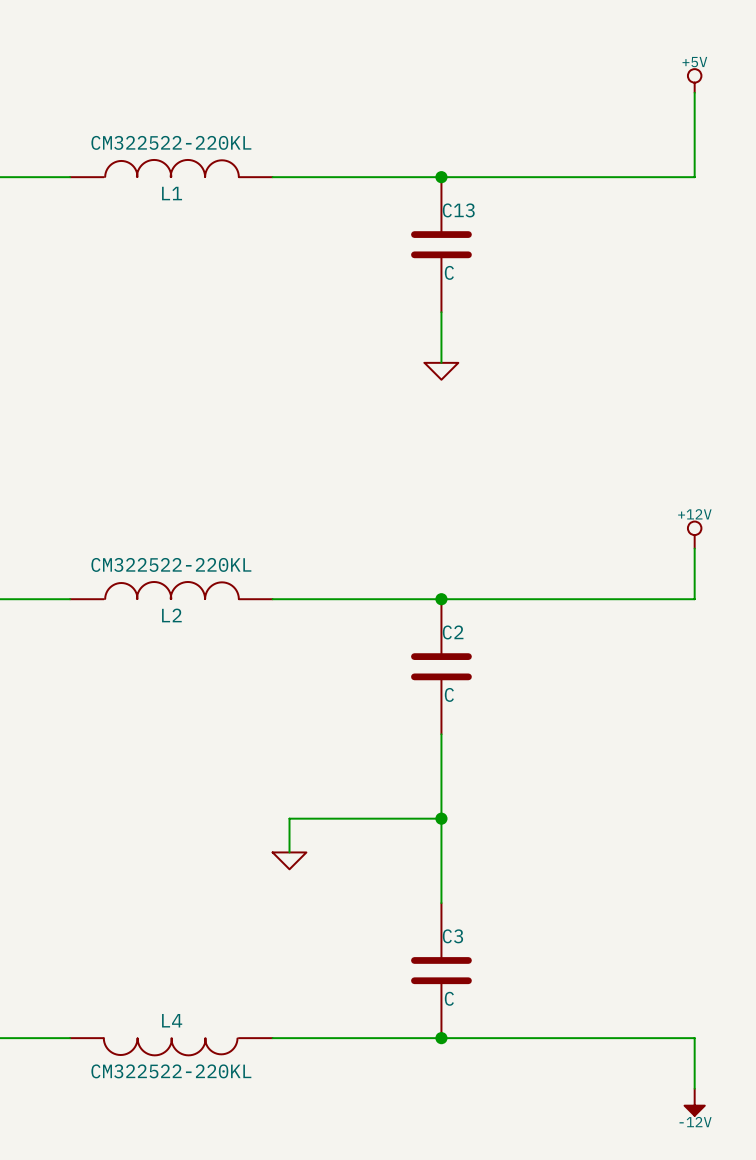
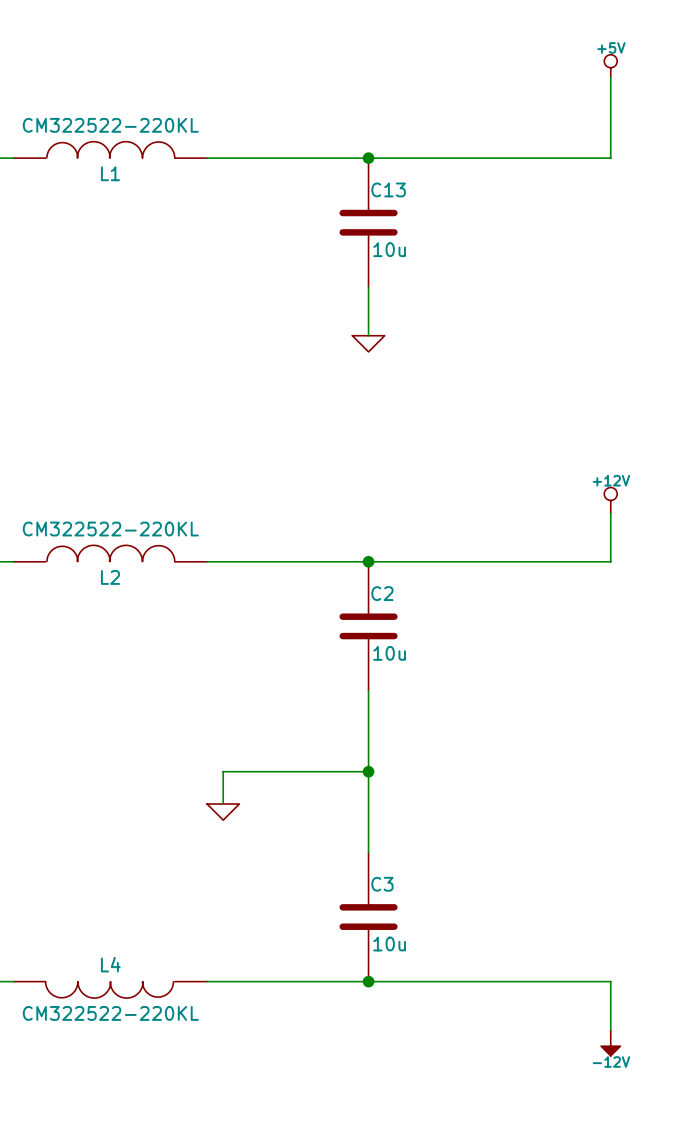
C13 value: C (449, 272) -> 10u (389, 249)
C2 value: C (449, 694) -> 10u (389, 653)
C3 value: C (449, 998) -> 10u (389, 944)

